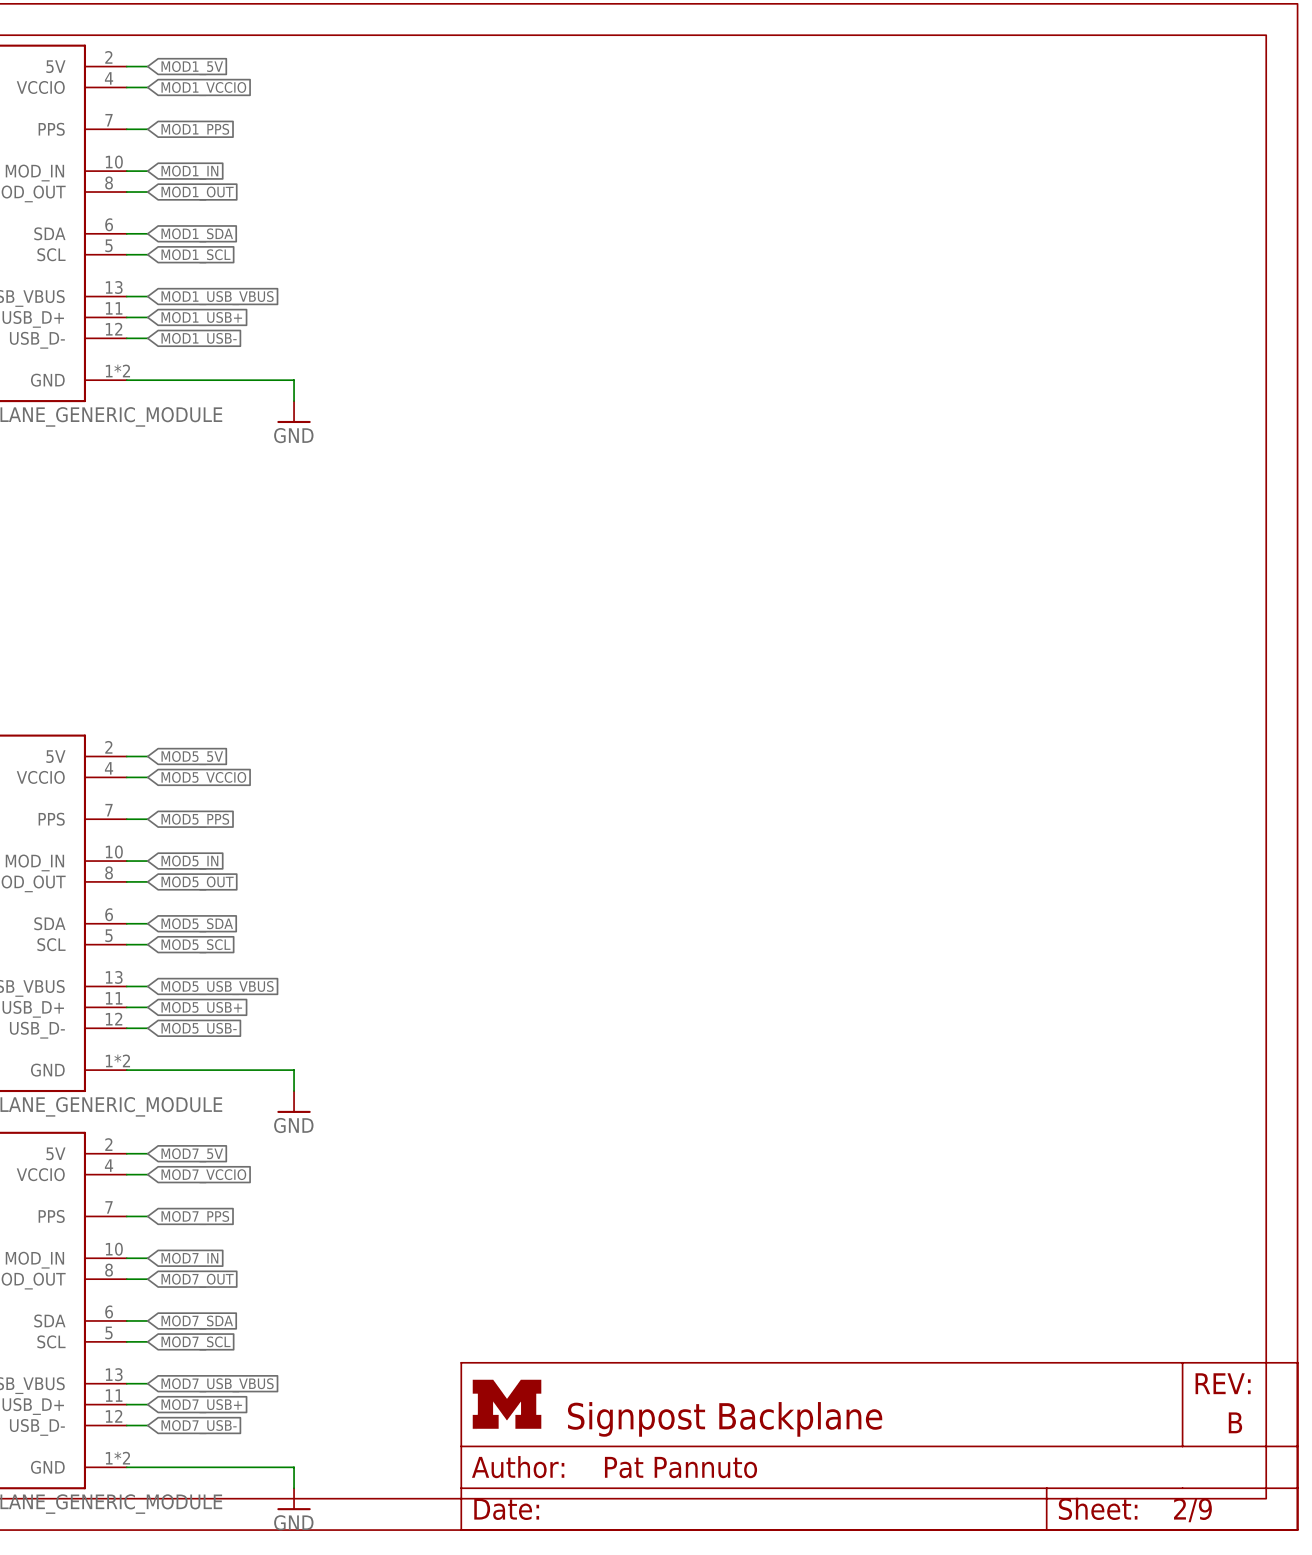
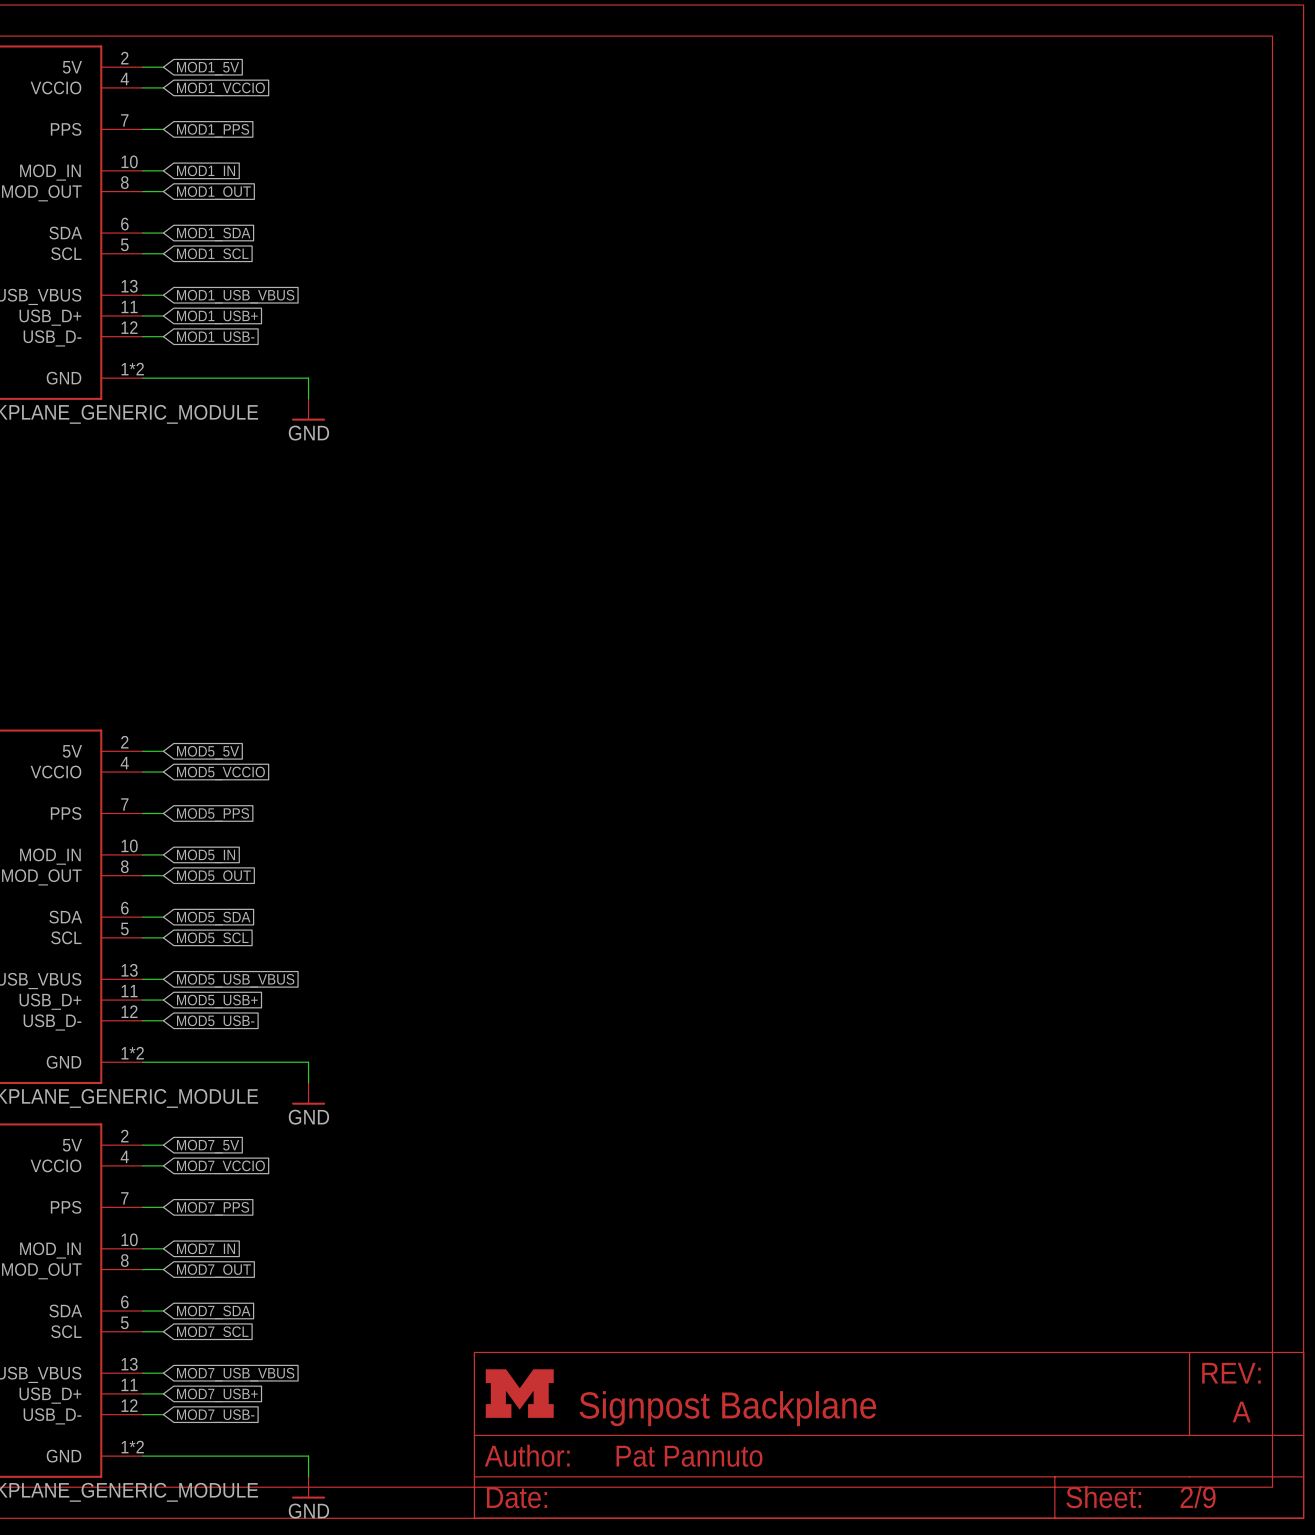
part text: B (1235, 1422) -> A (1241, 1412)

